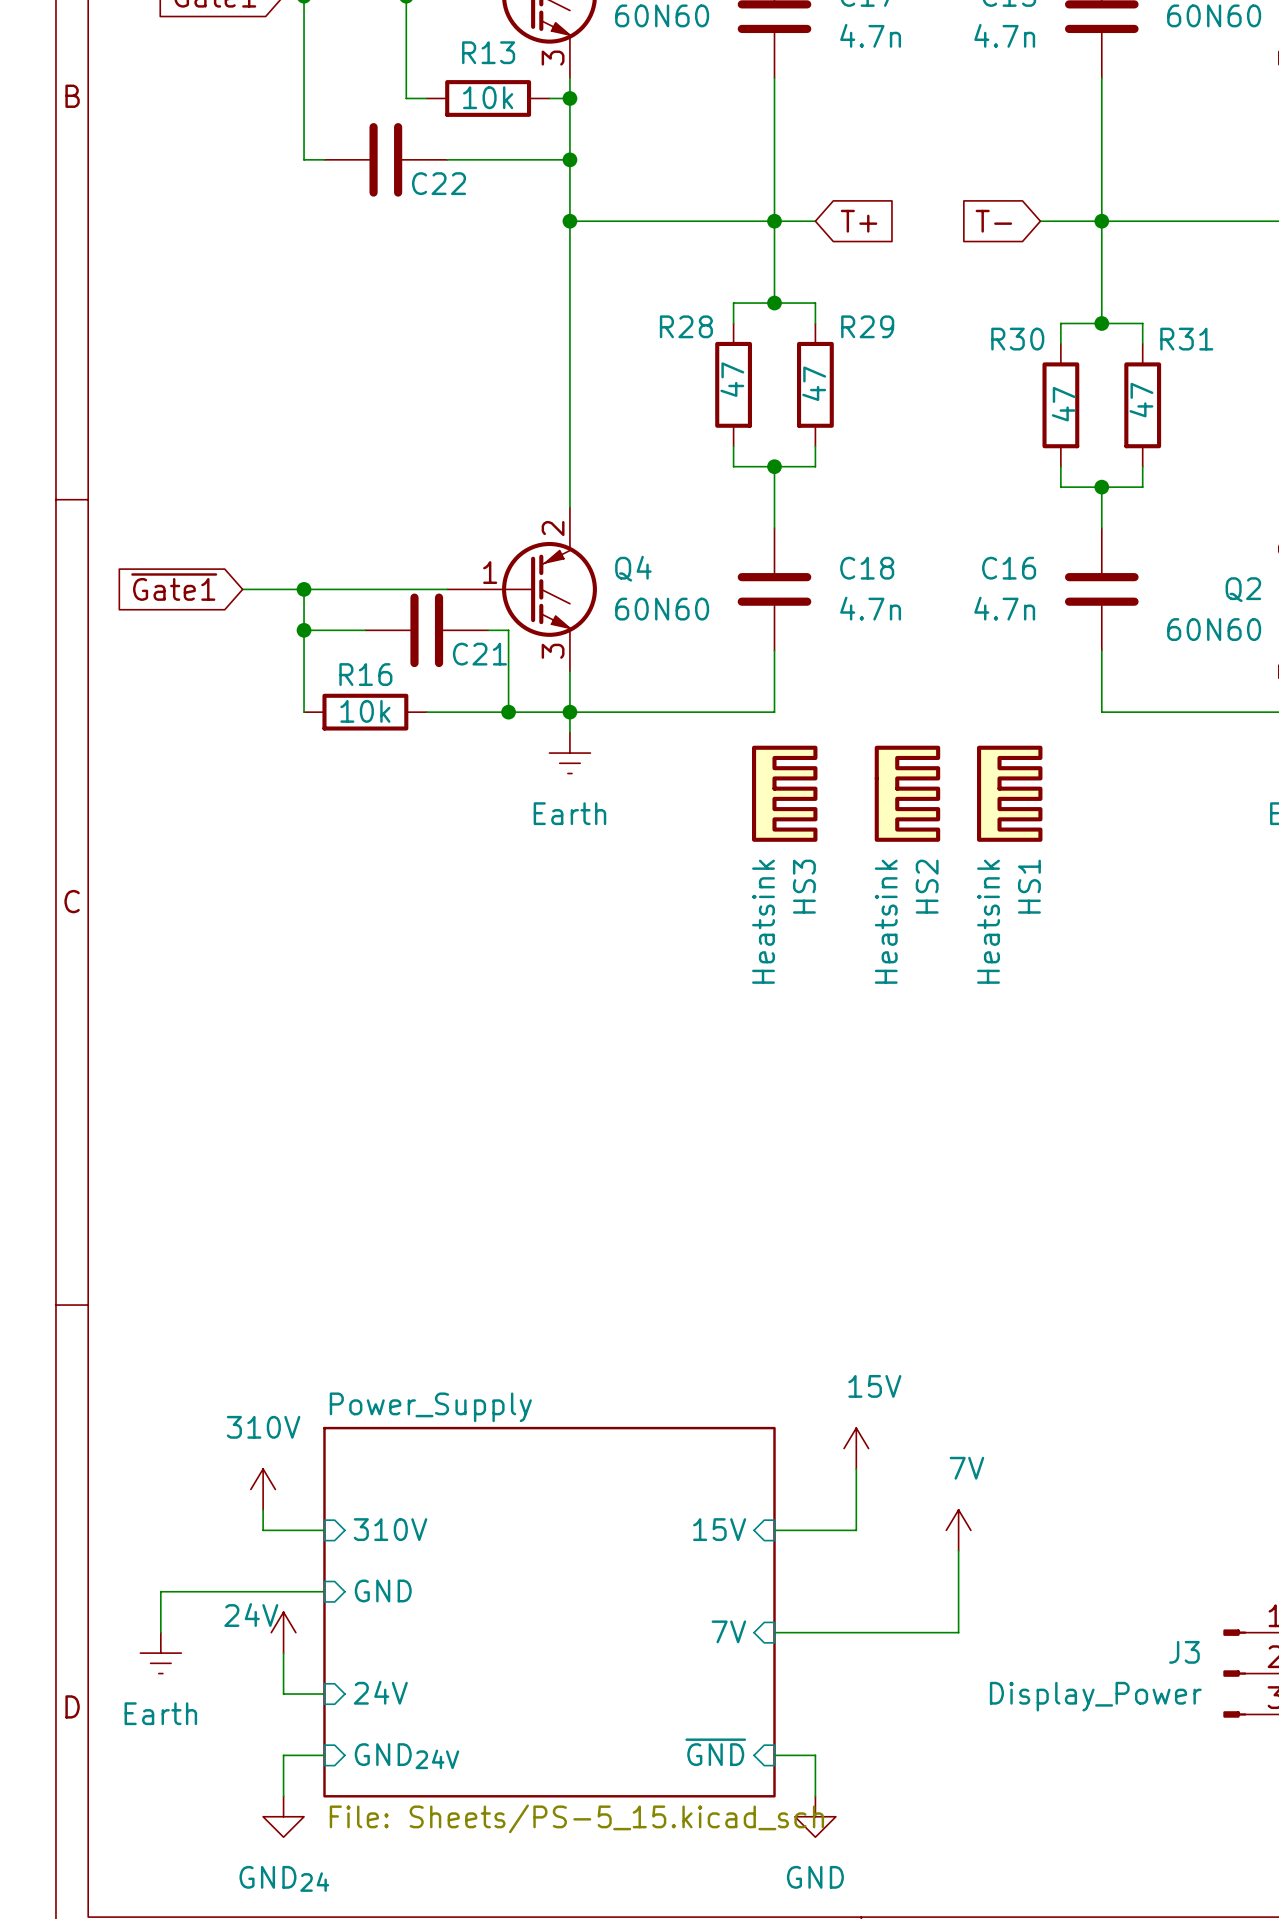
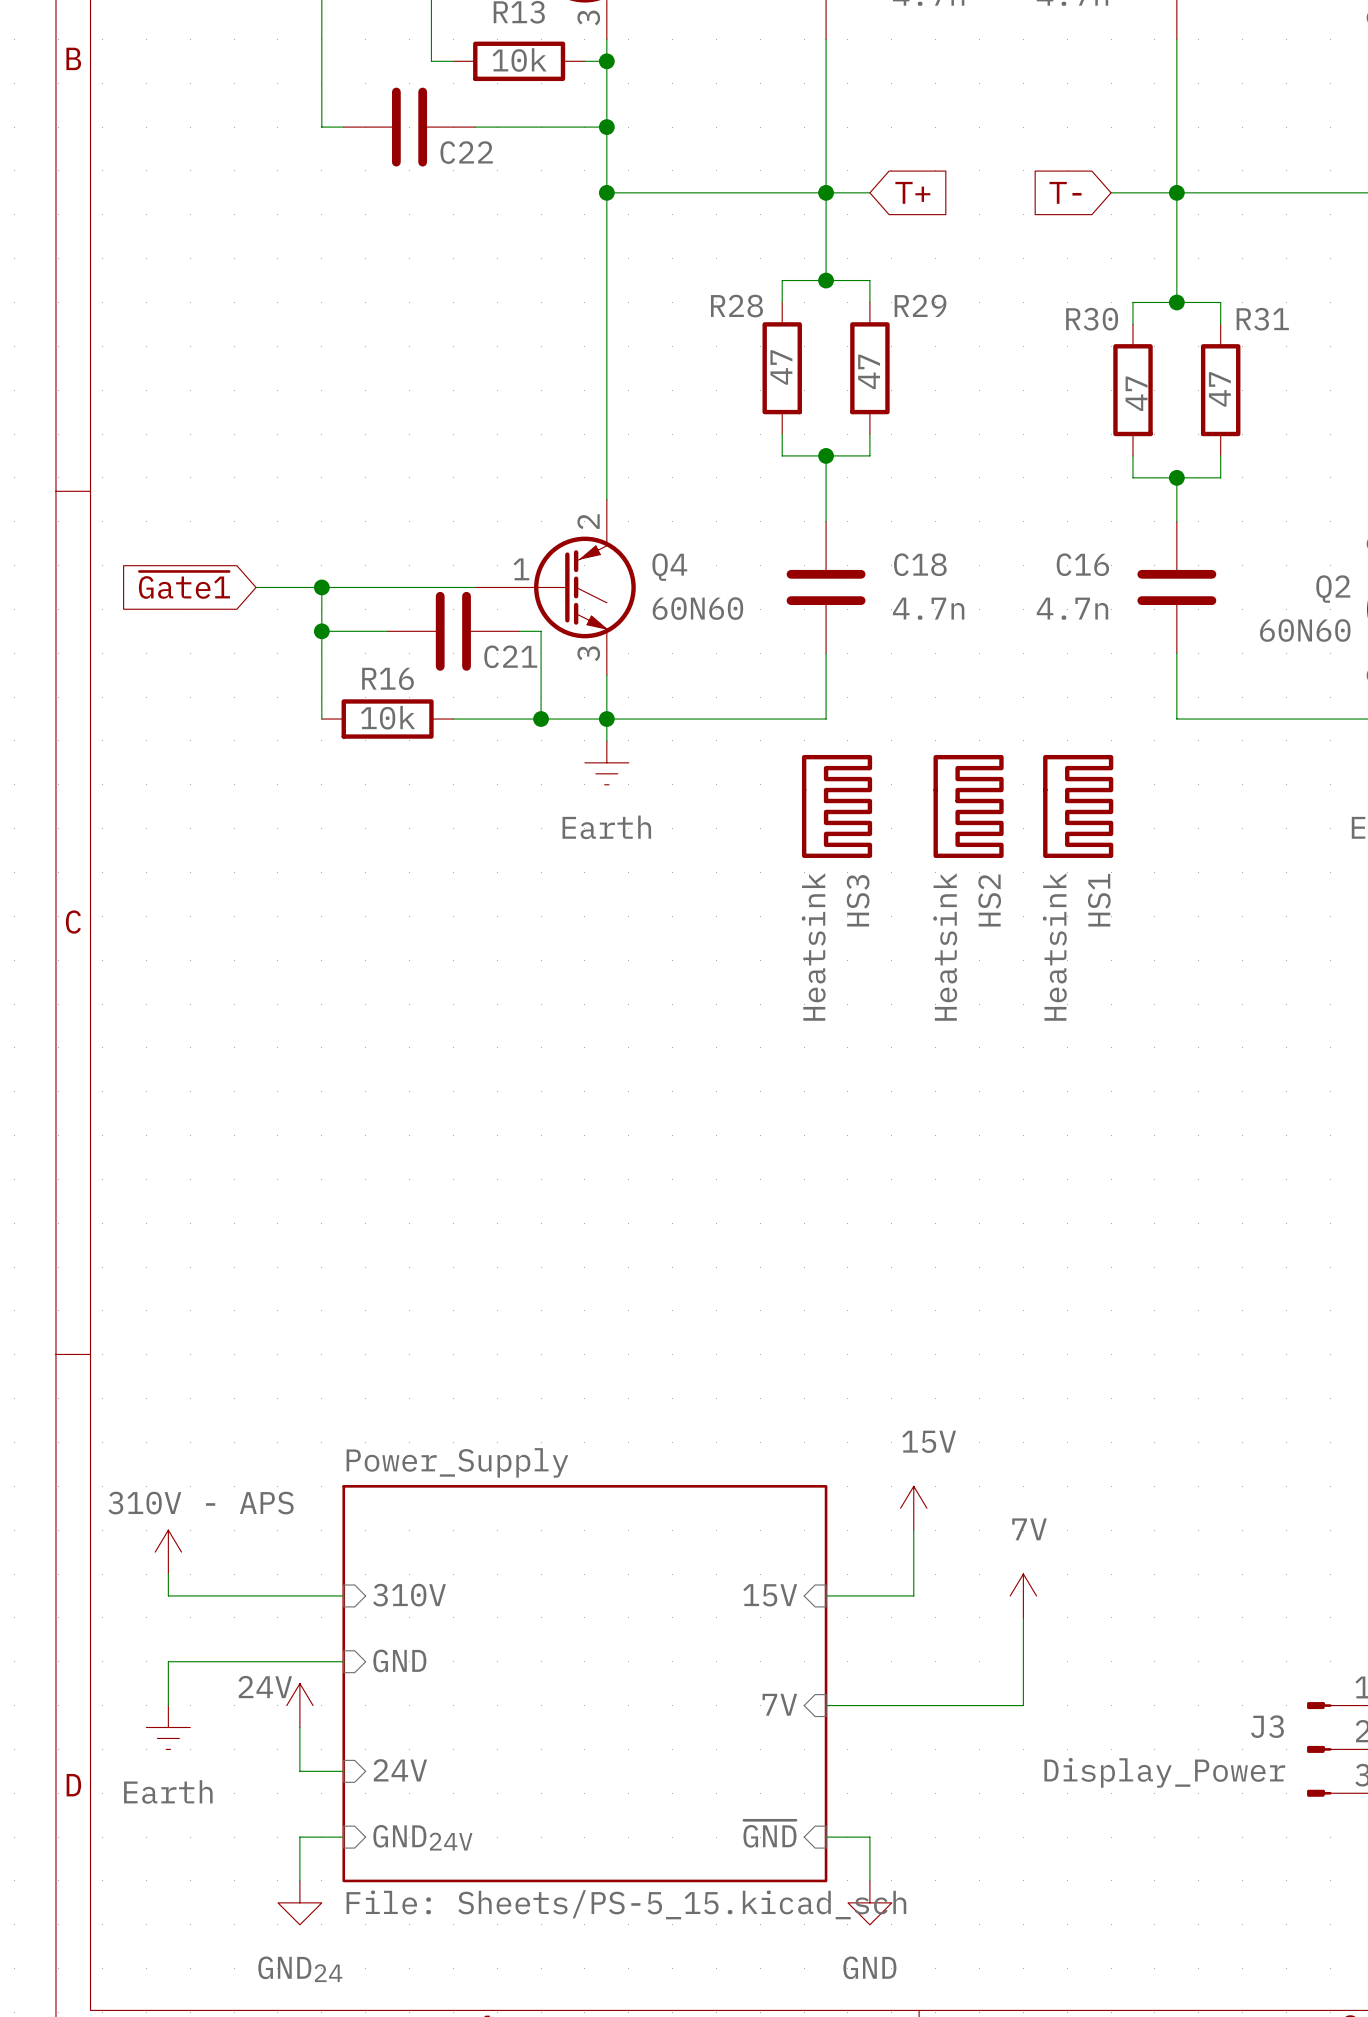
power symbol: none -> 310V - APS (168, 1552)
power symbol: 310V (263, 1489) -> none
wire: (263, 1509) (263, 1530) -> (168, 1574) (168, 1595) (277, 1595)

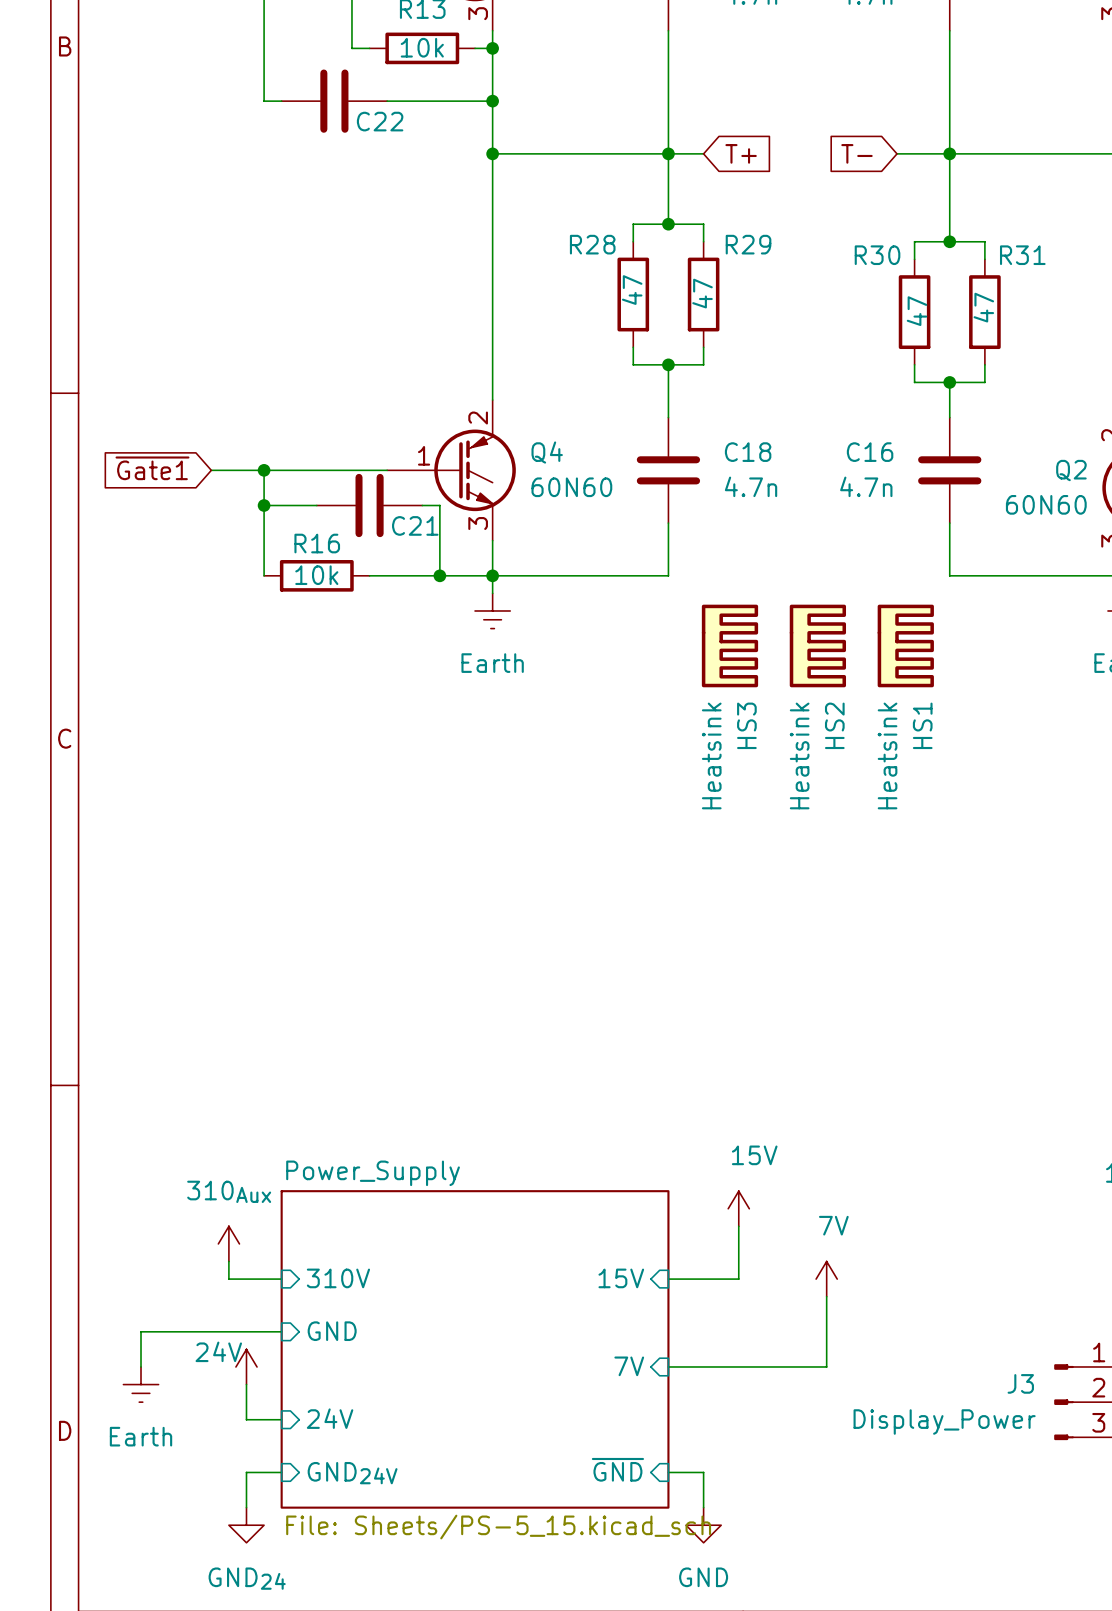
HS3 position: (837, 806) -> (729, 645)
HS2 position: (968, 806) -> (817, 645)
HS1 position: (1078, 806) -> (905, 645)
power symbol: 310V - APS (168, 1552) -> none
power symbol: none -> 310Aux (228, 1243)
wire: (168, 1574) (168, 1595) (277, 1595) -> (228, 1261) (228, 1279)

